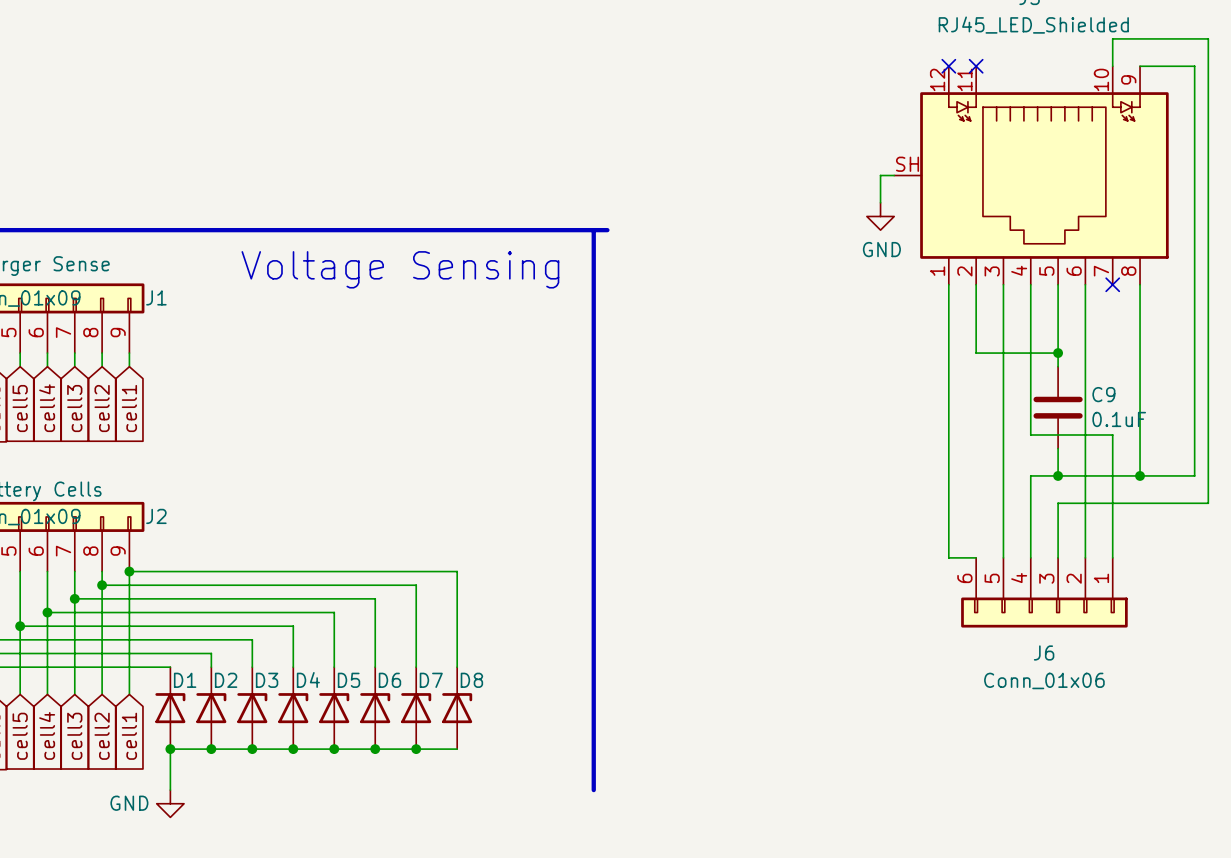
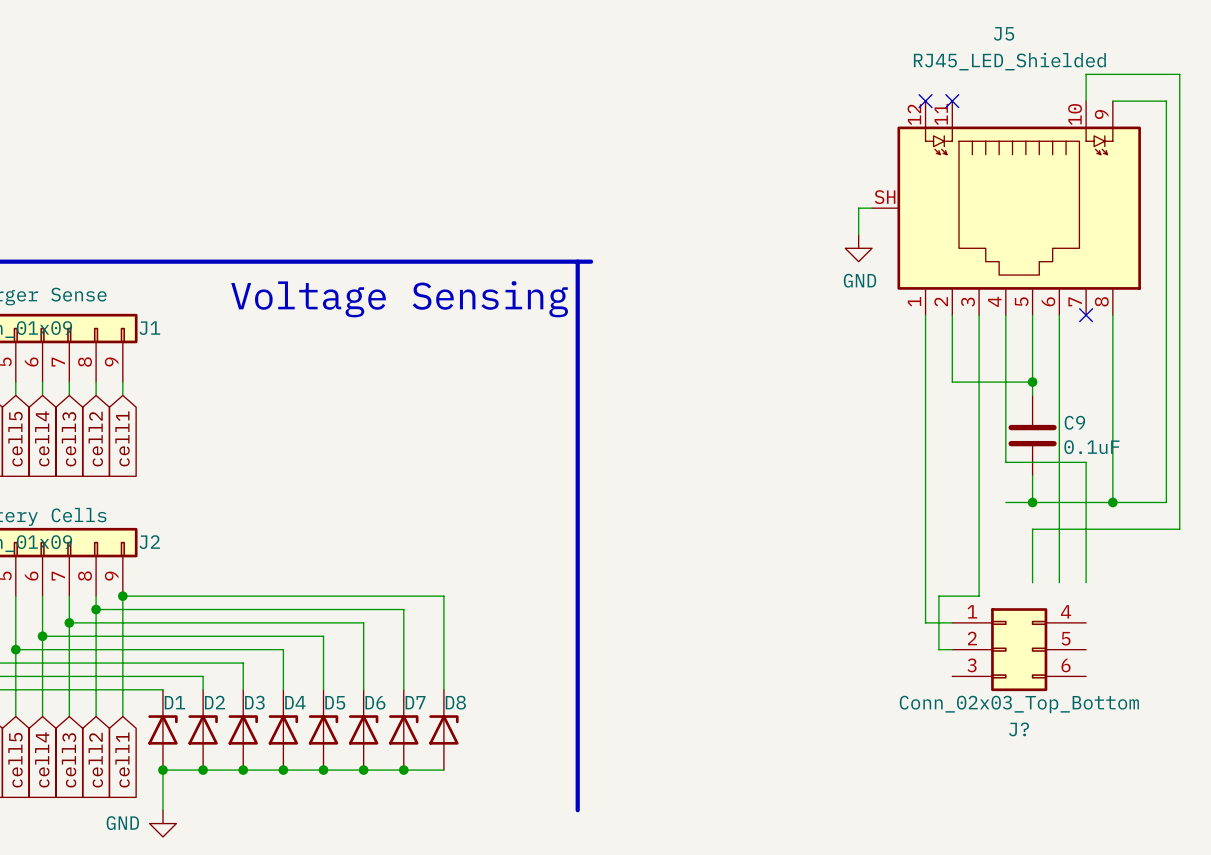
wire: (1030, 475) (1030, 557) -> none
wire: (948, 557) (976, 557) -> (925, 582) (925, 622) (952, 622)
wire: none -> (979, 582) (979, 596) (938, 596) (938, 649) (952, 649)
J6: Conn_01x06 (1044, 592) -> none
J?: none -> Conn_02x03_Top_Bottom (1019, 649)

